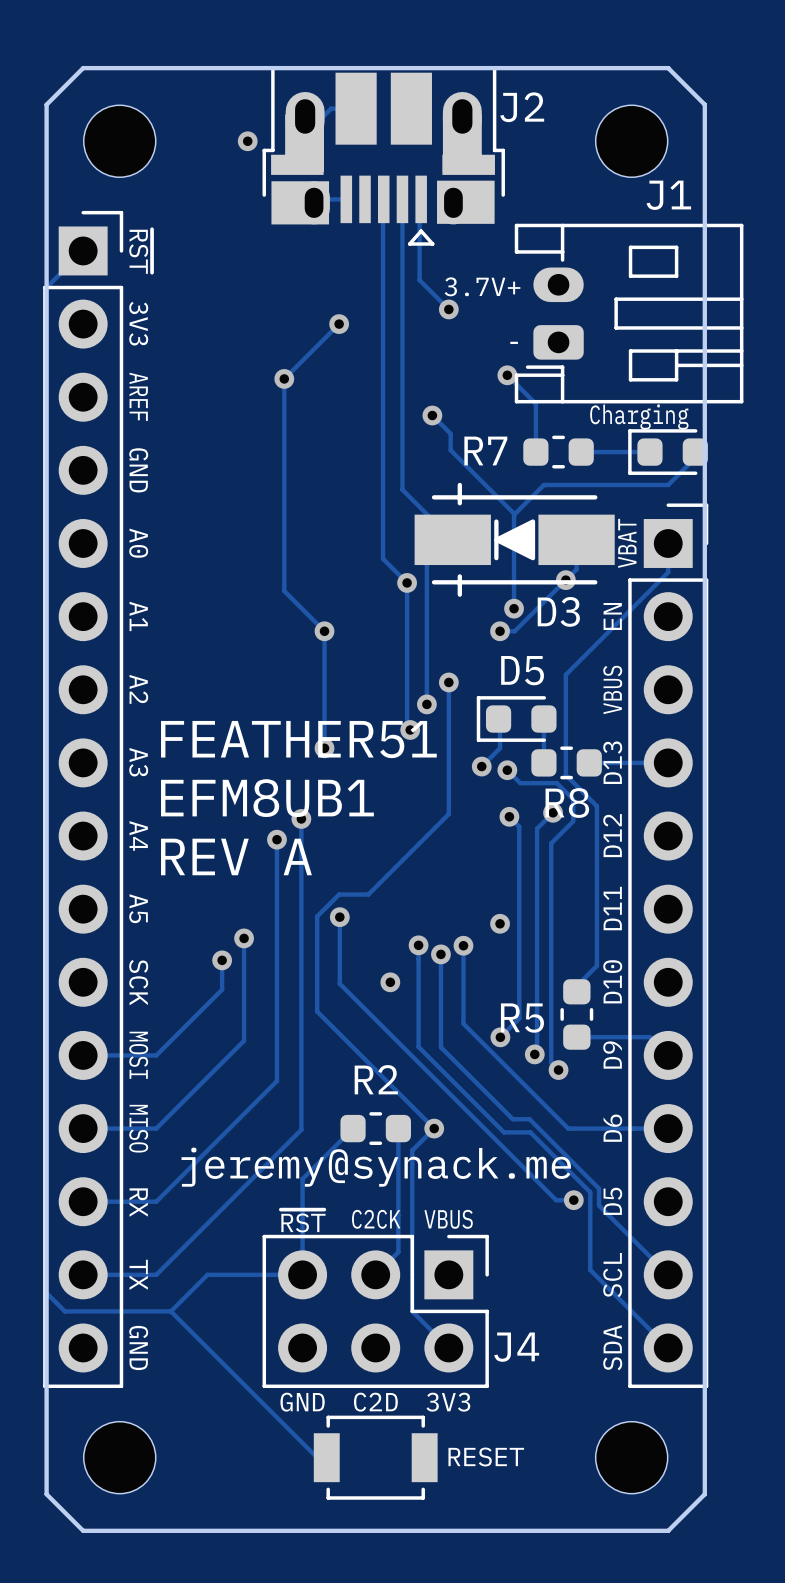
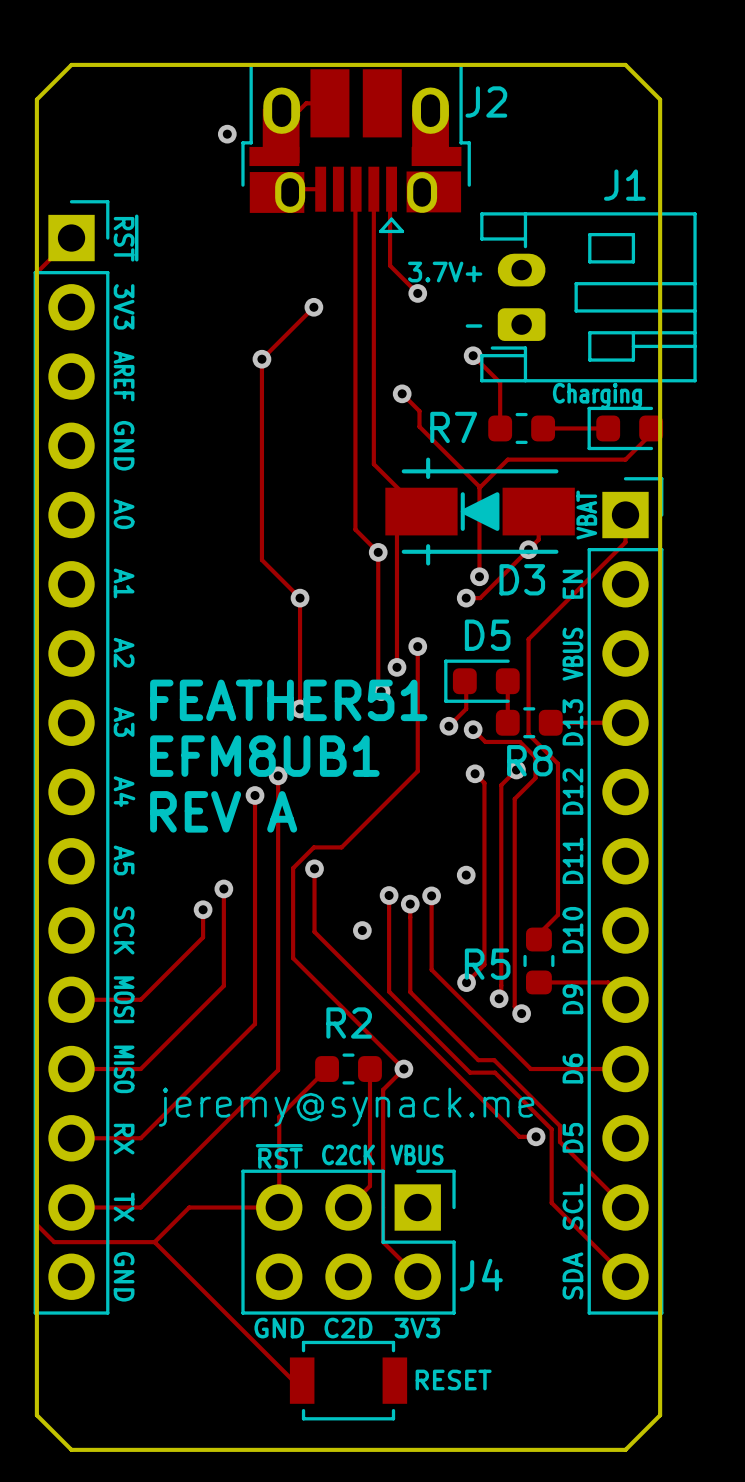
part: (119, 141) -> none
part: (631, 141) -> none
part: (119, 1457) -> none
part: (631, 1457) -> none

